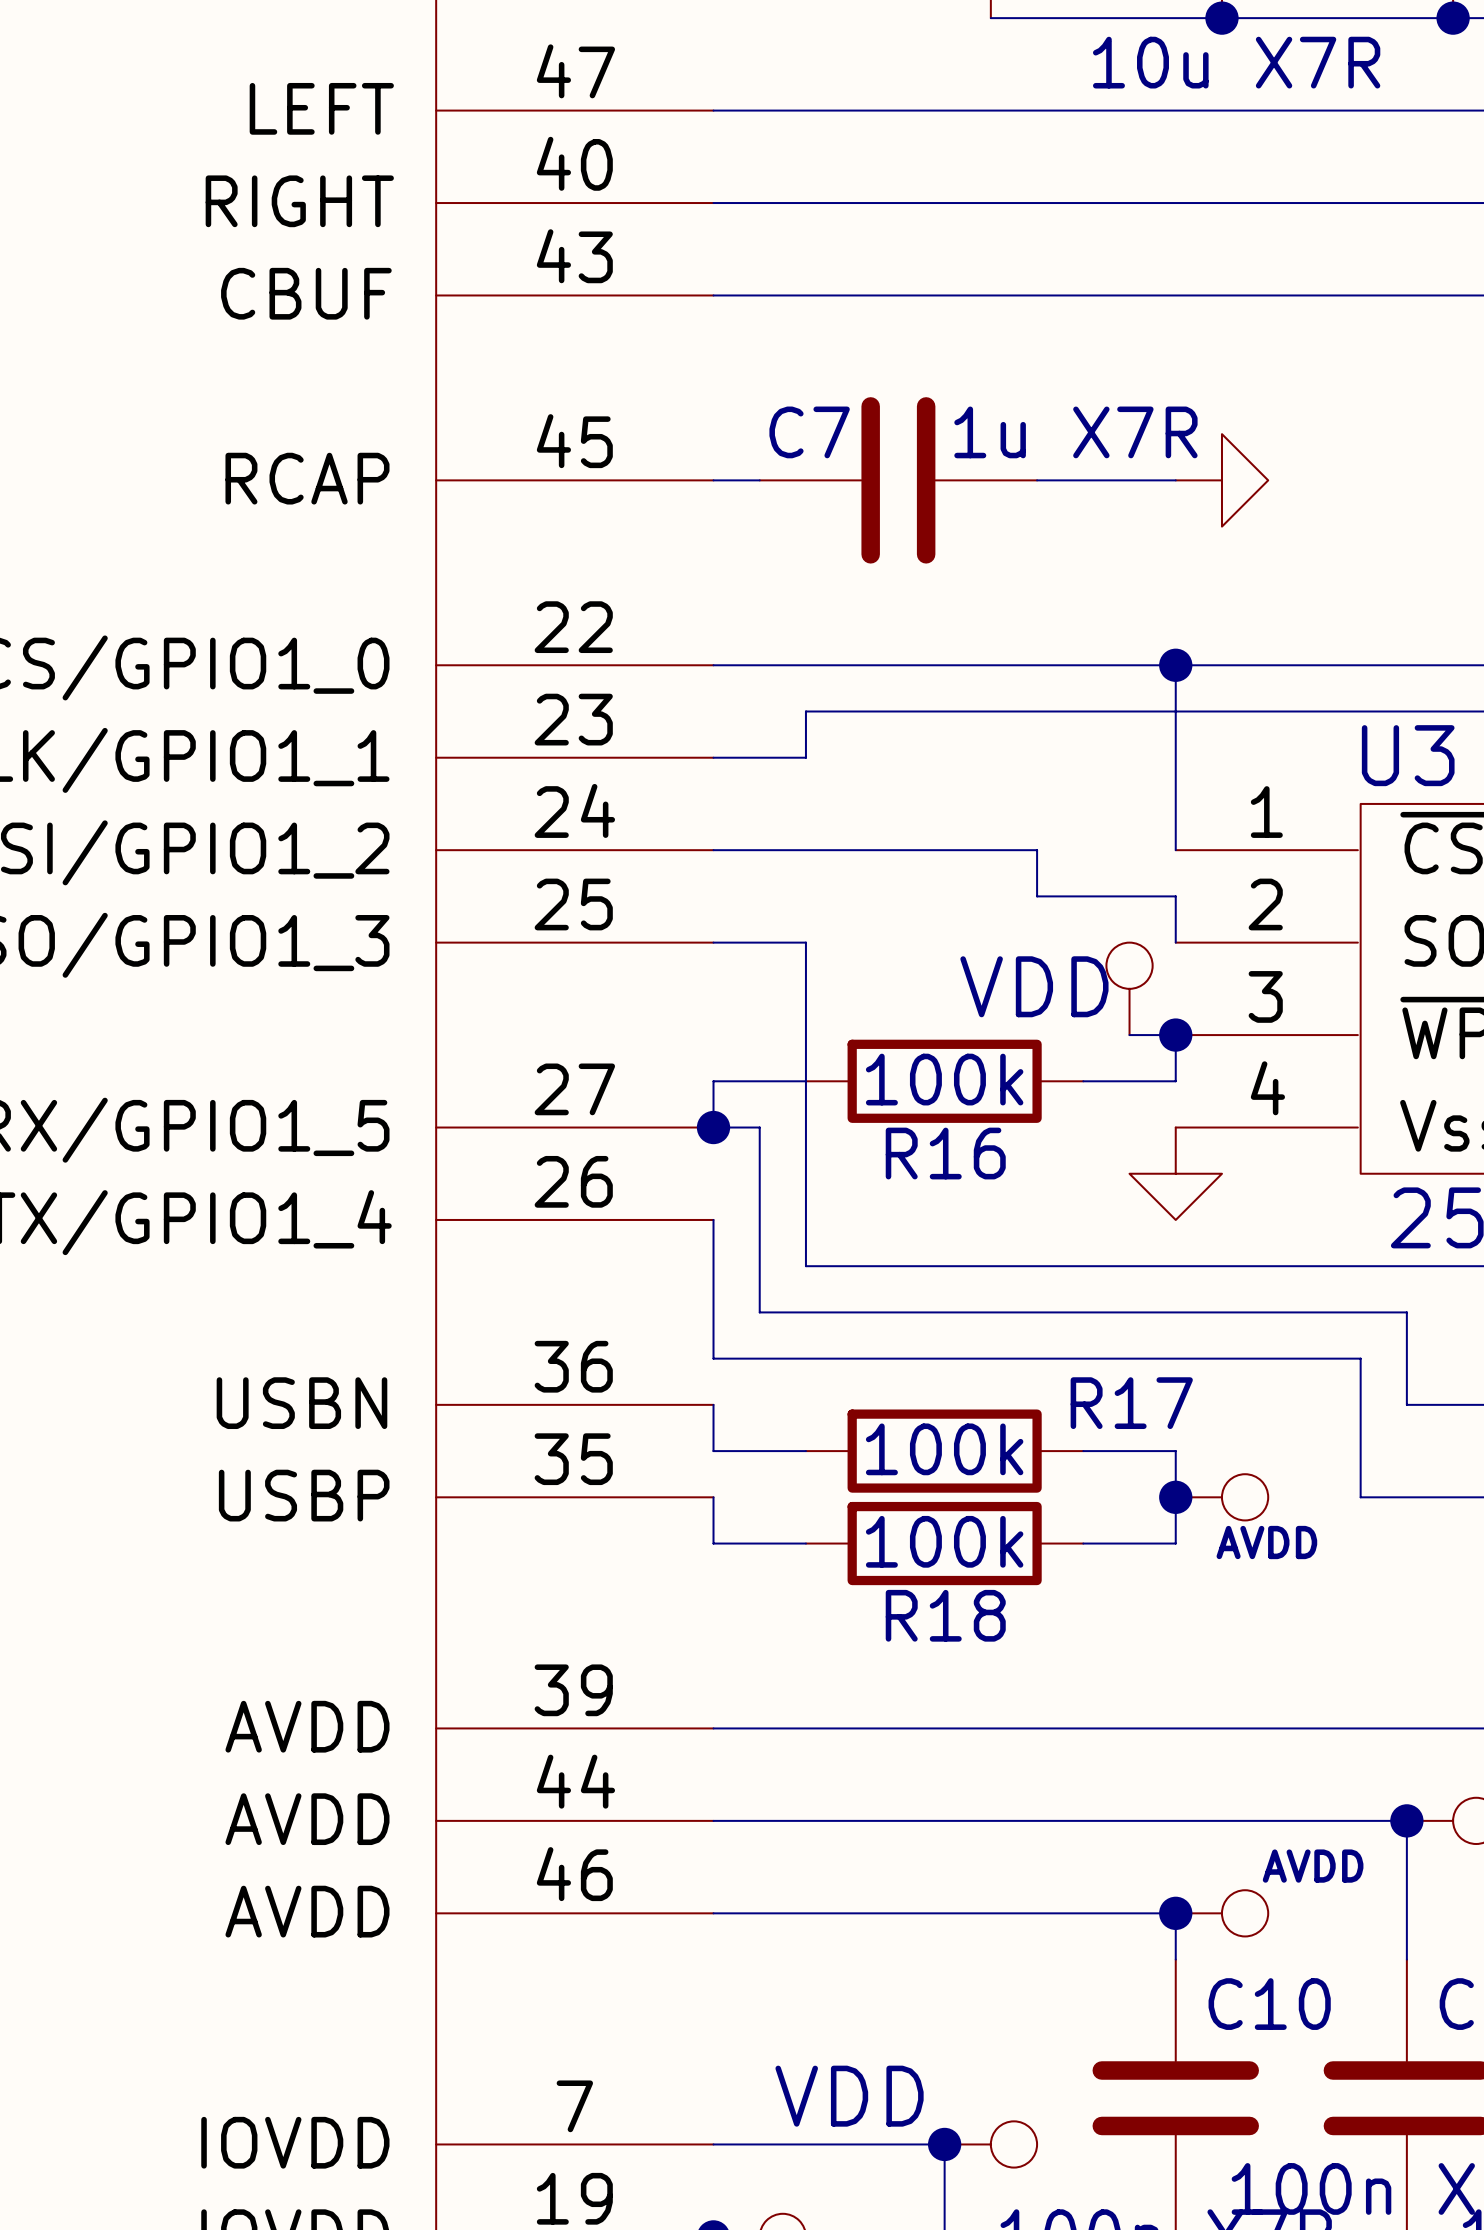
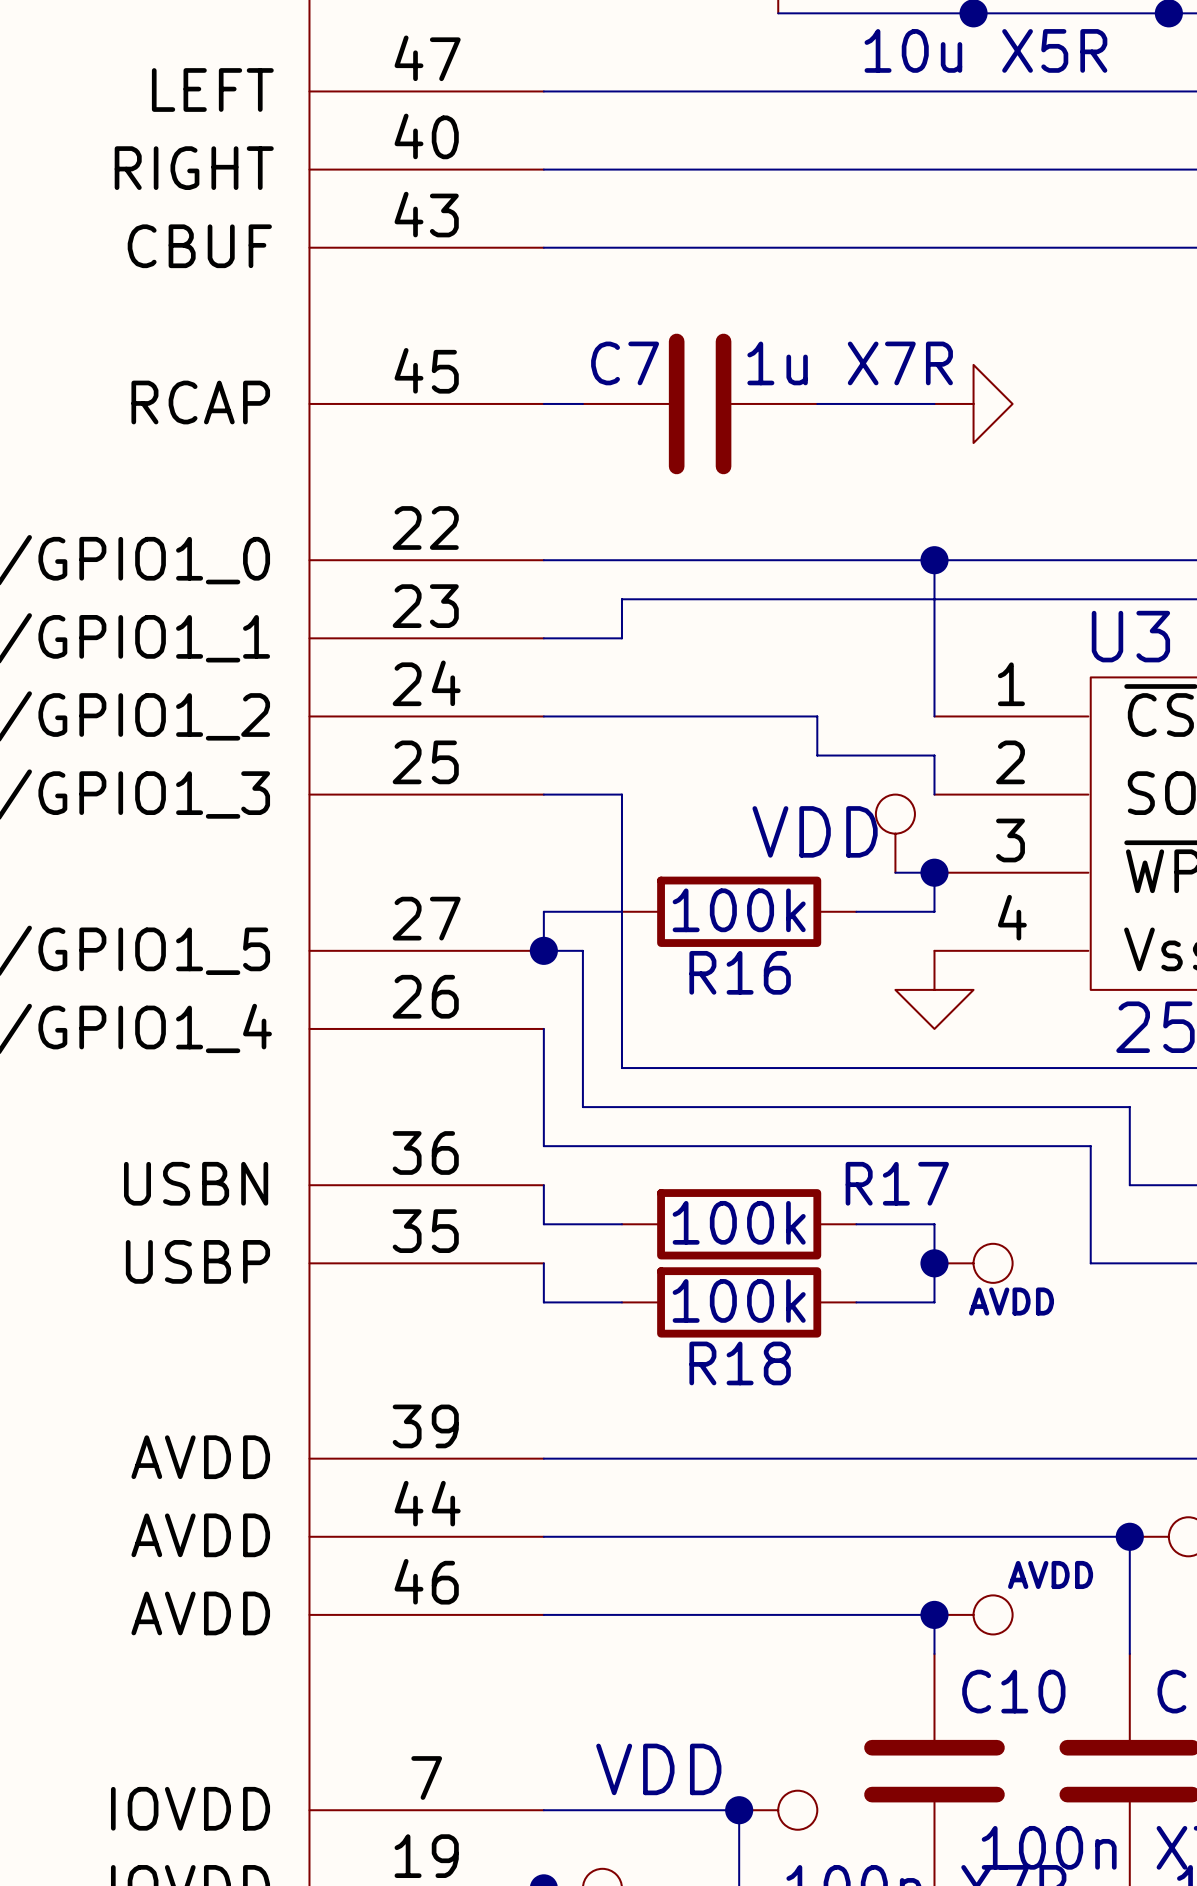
part value: 10u X7R (1236, 62) -> 10u X5R (985, 50)

